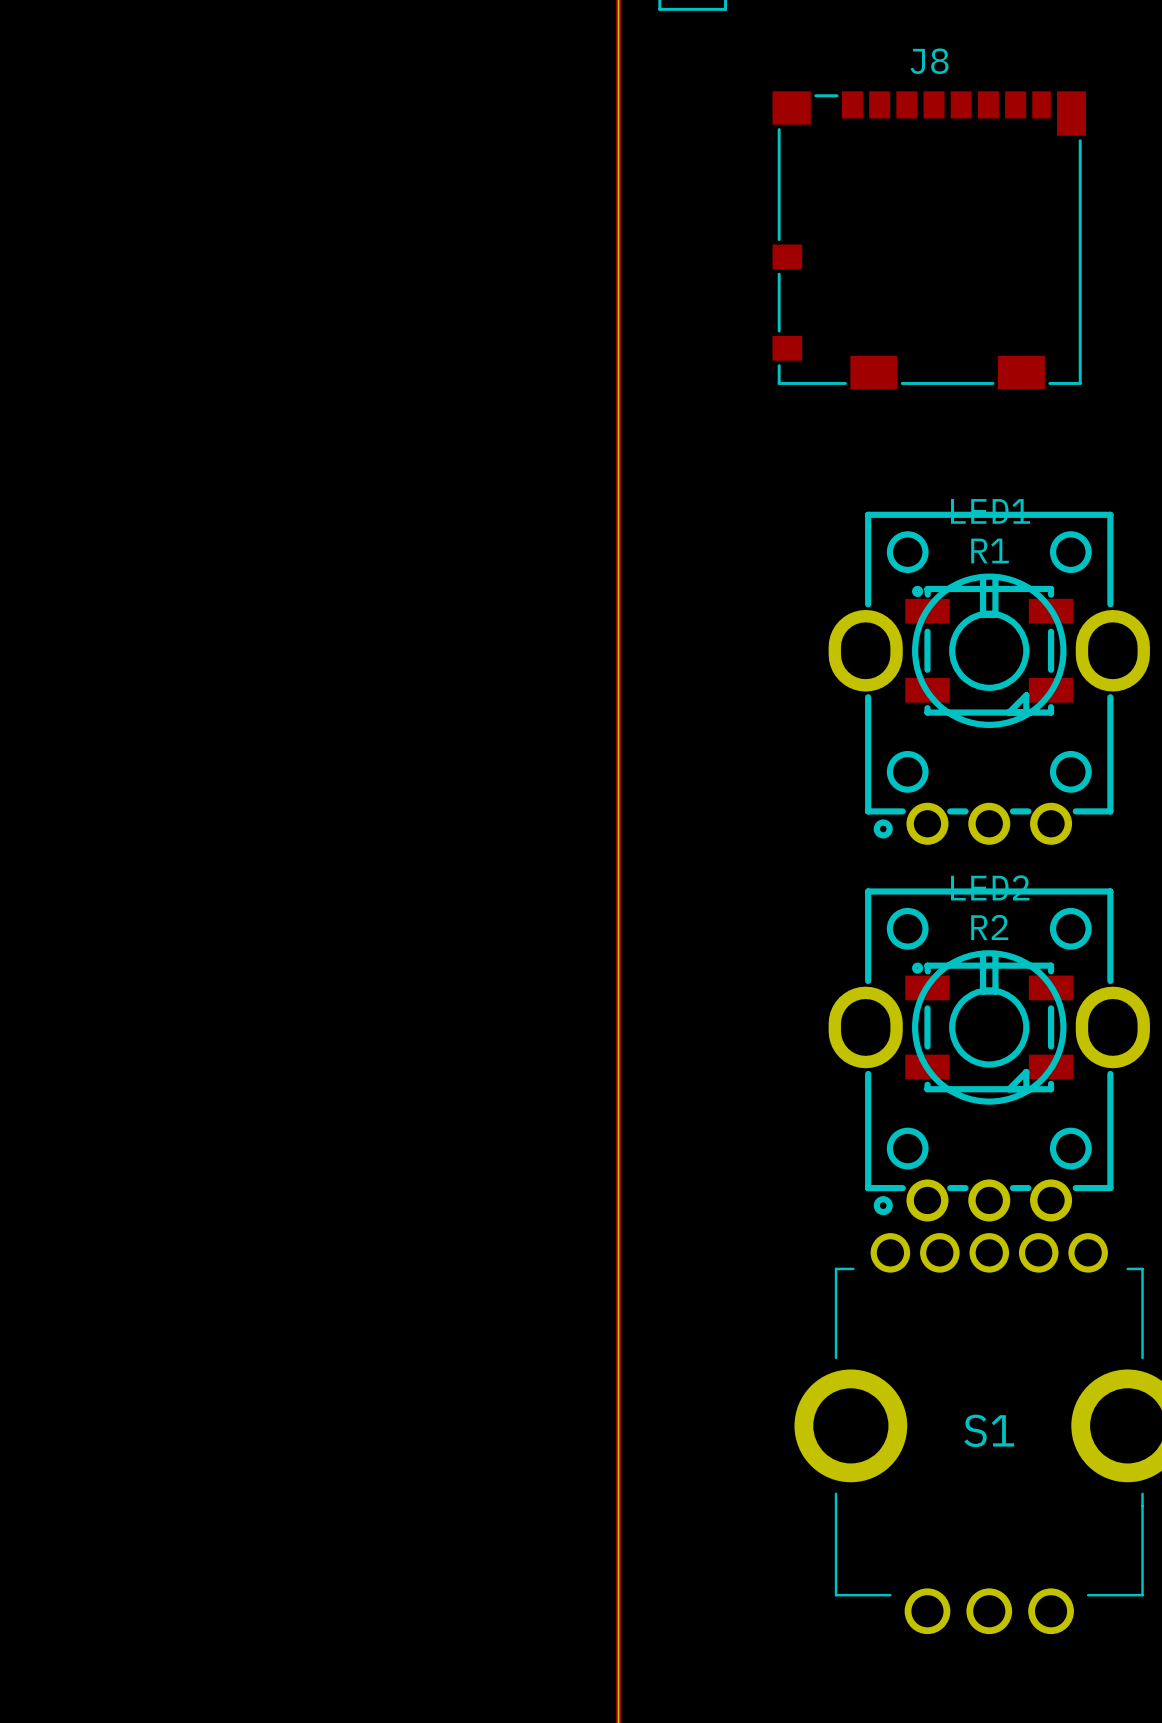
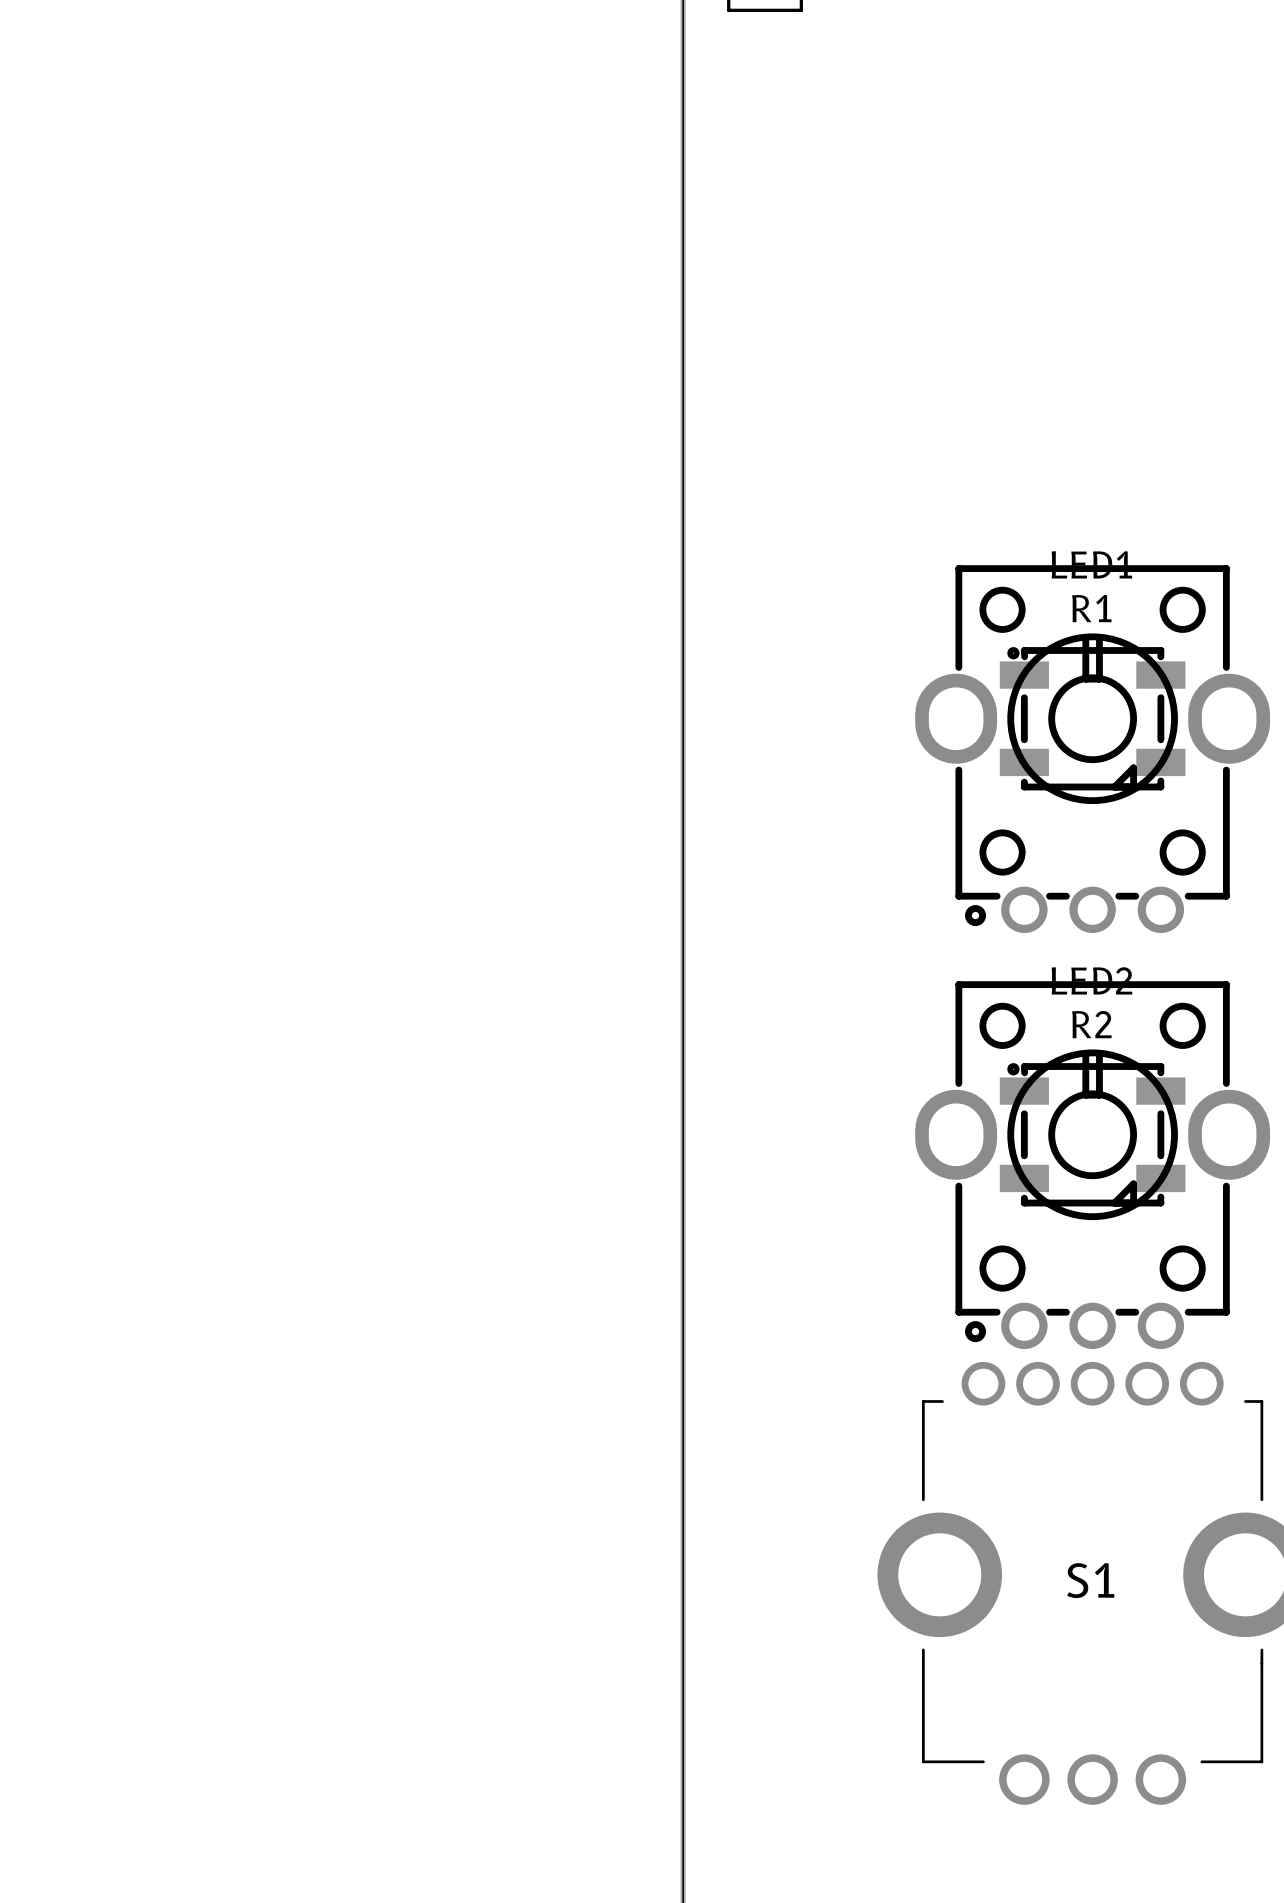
J8: (929, 240) -> none

